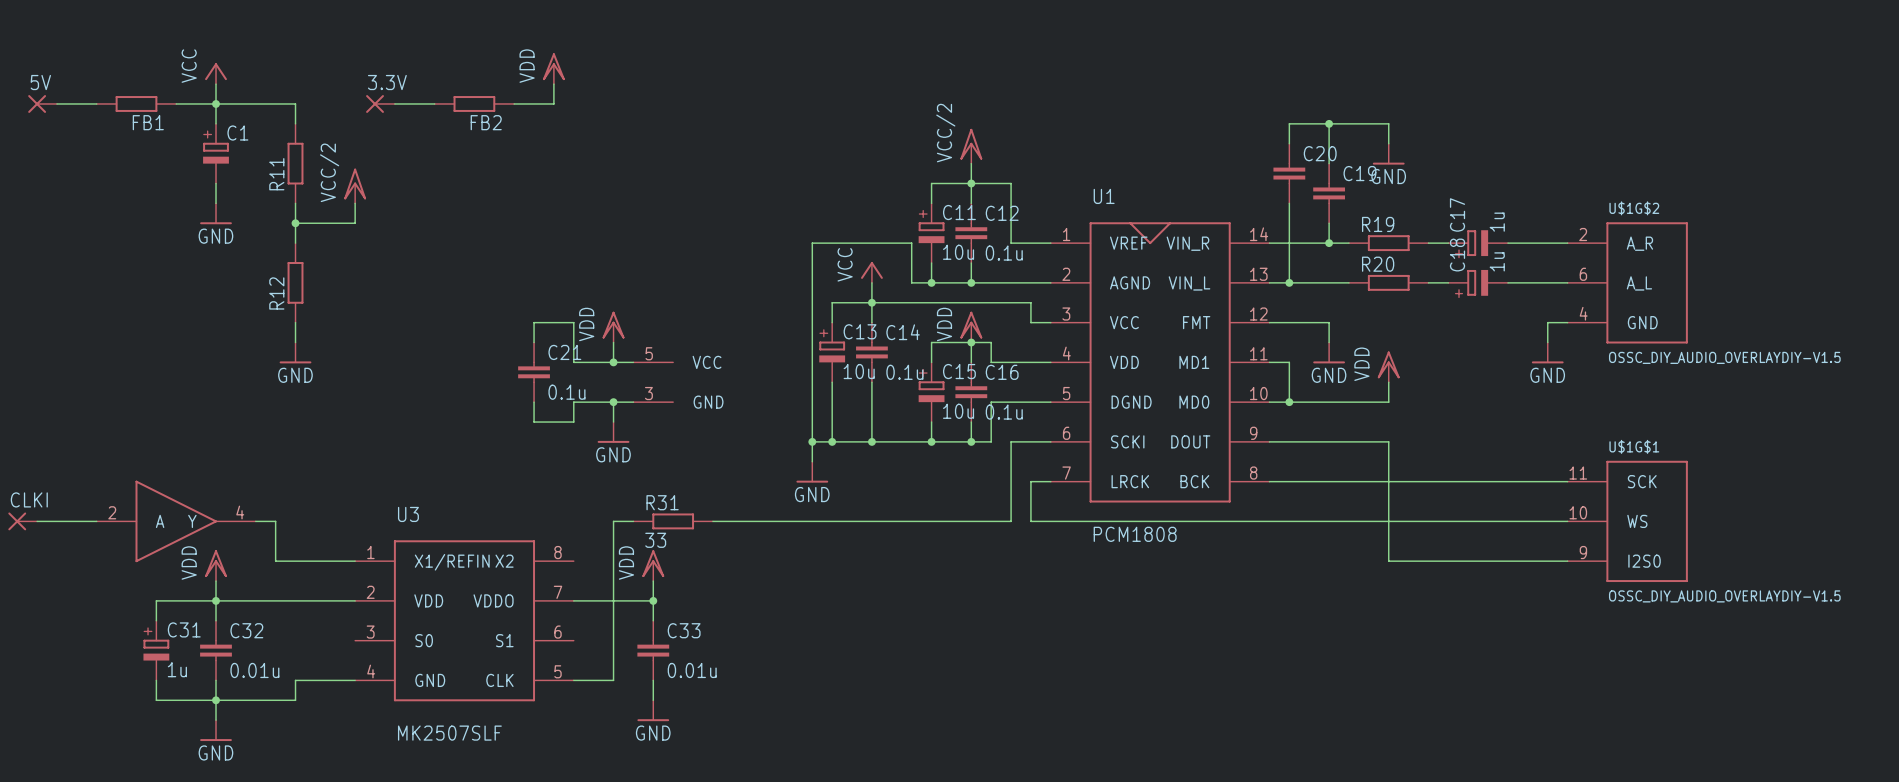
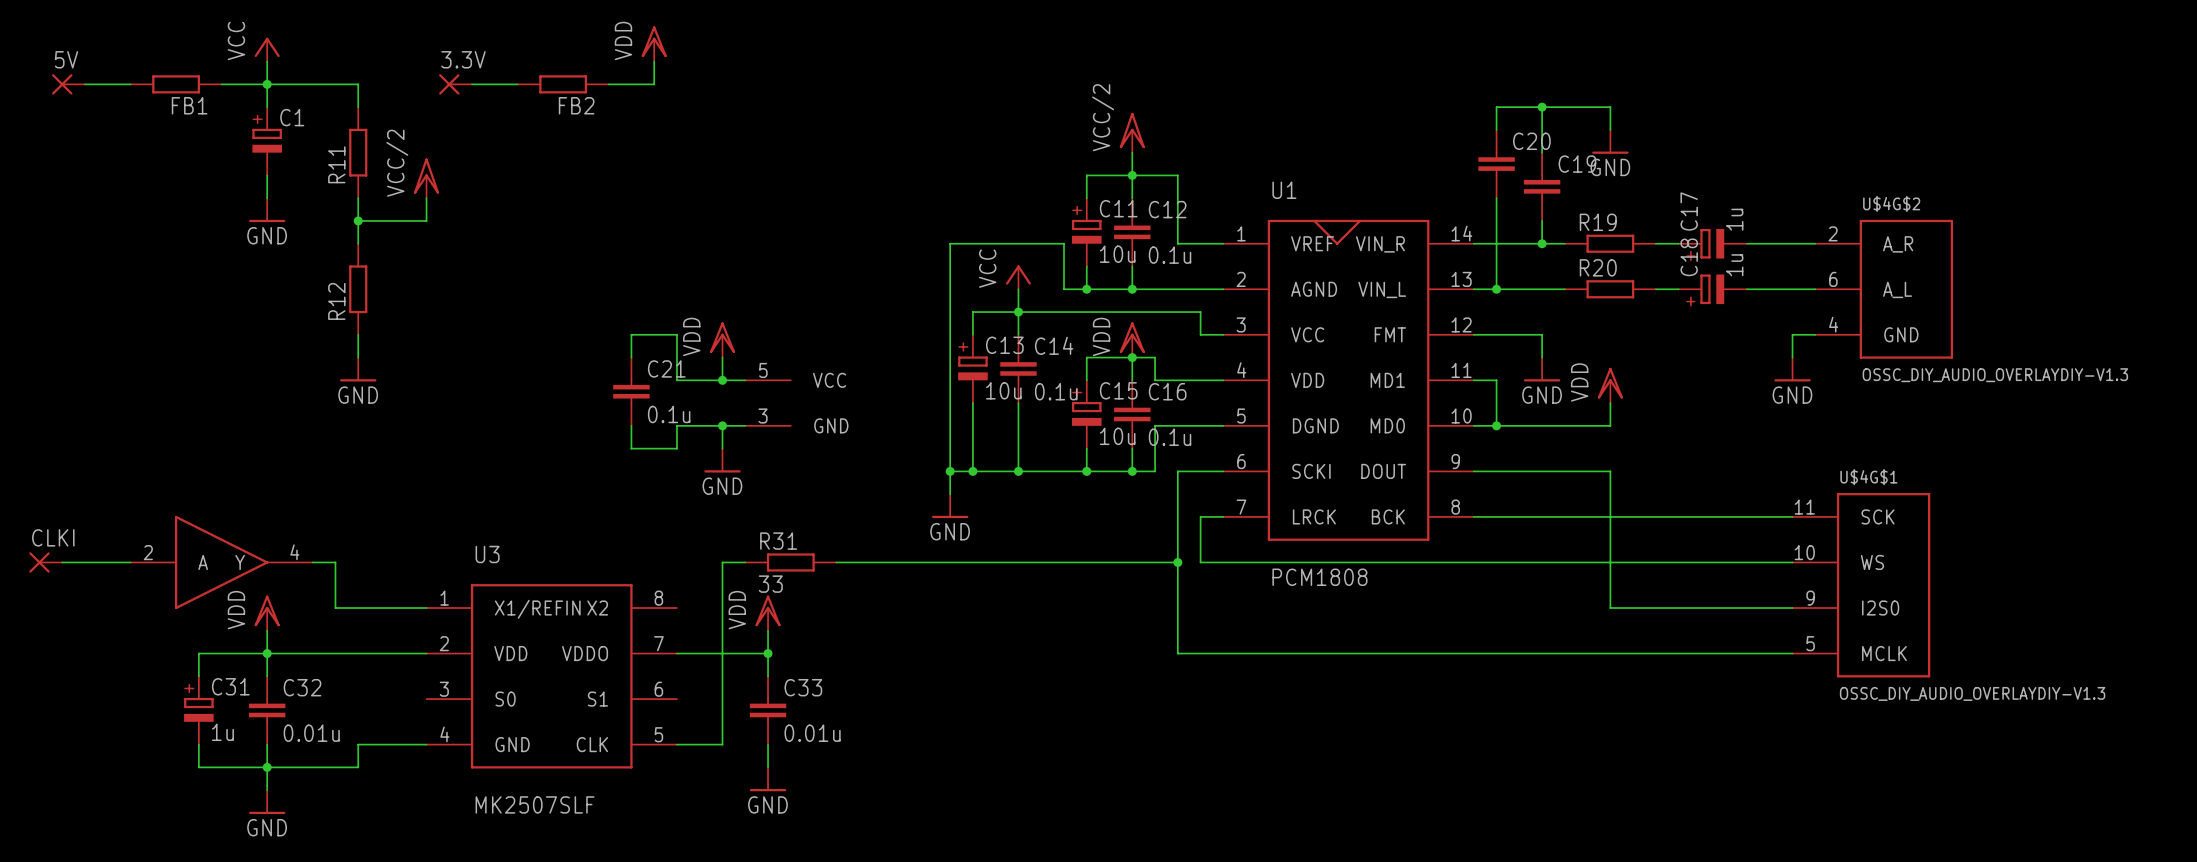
U$1G$2 name: U$1G$2 (1634, 208) -> U$4G$2 (1891, 203)
U$1G$2 value: OSSC_DIY_AUDIO_OVERLAYDIY-V1.5 (1724, 357) -> OSSC_DIY_AUDIO_OVERLAYDIY-V1.3 (1995, 375)
wire: none -> (1177, 562) (1177, 653) (1792, 653)
junction: none -> (1177, 562)
U$1G$1: OSSC_DIY_AUDIO_OVERLAYDIY-V1.5 (1627, 521) -> none
U$4G$1: none -> OSSC_DIY_AUDIO_OVERLAYDIY-V1.3 (1861, 585)

